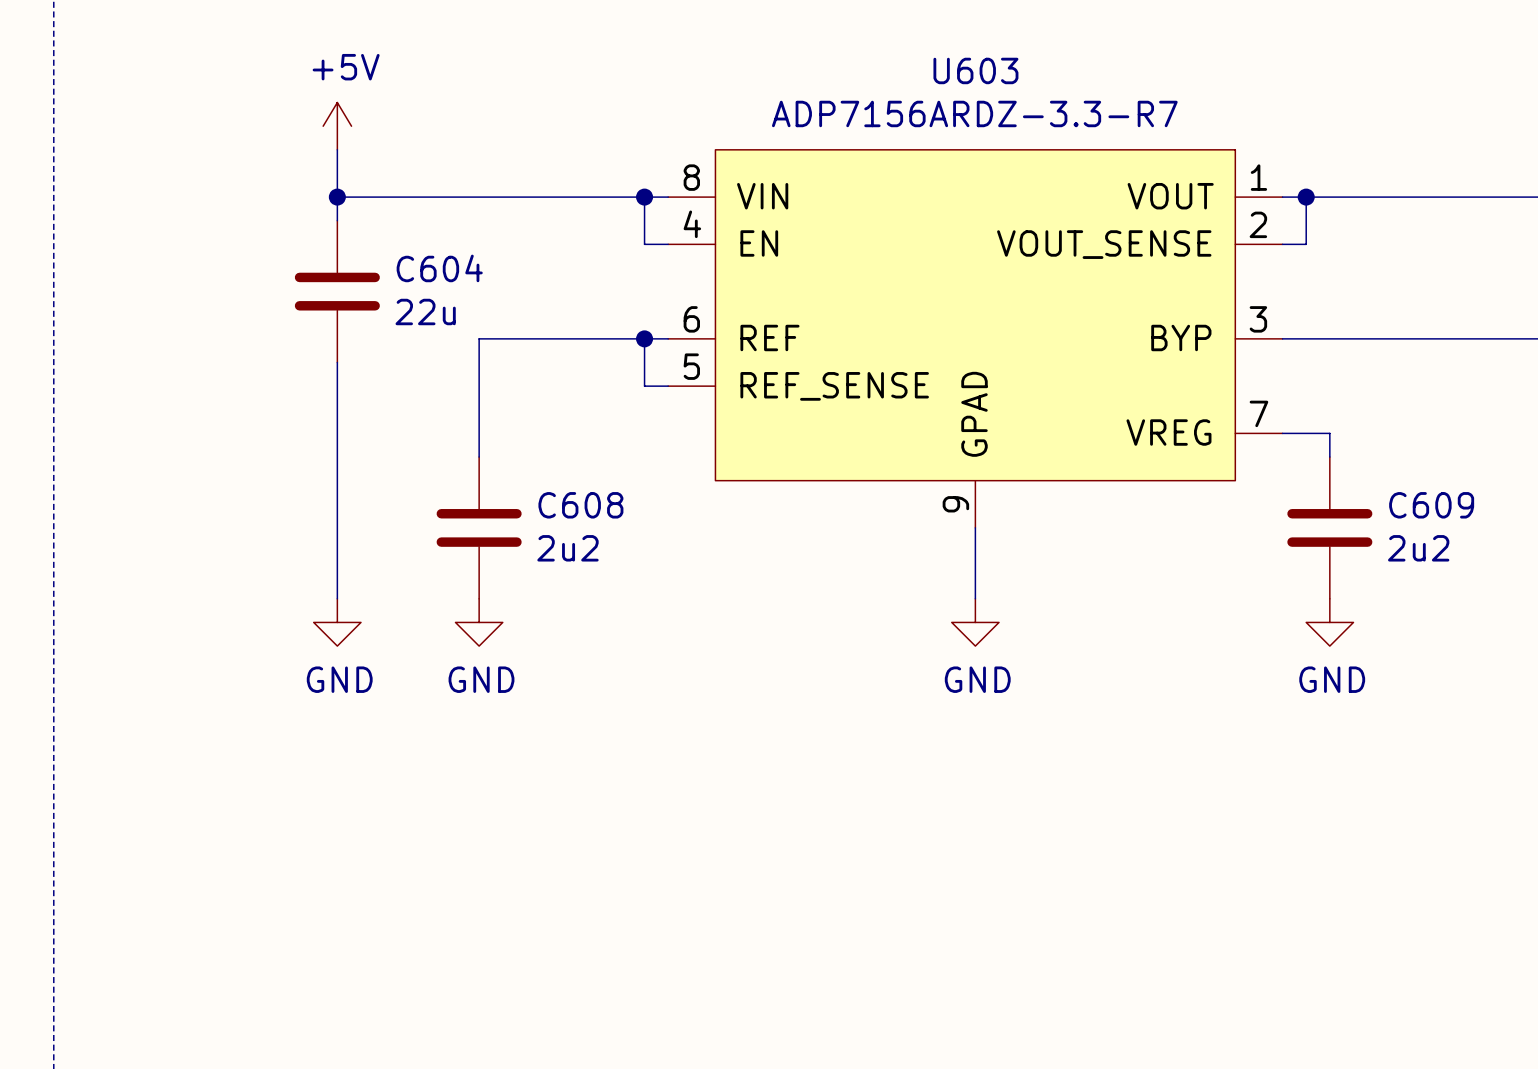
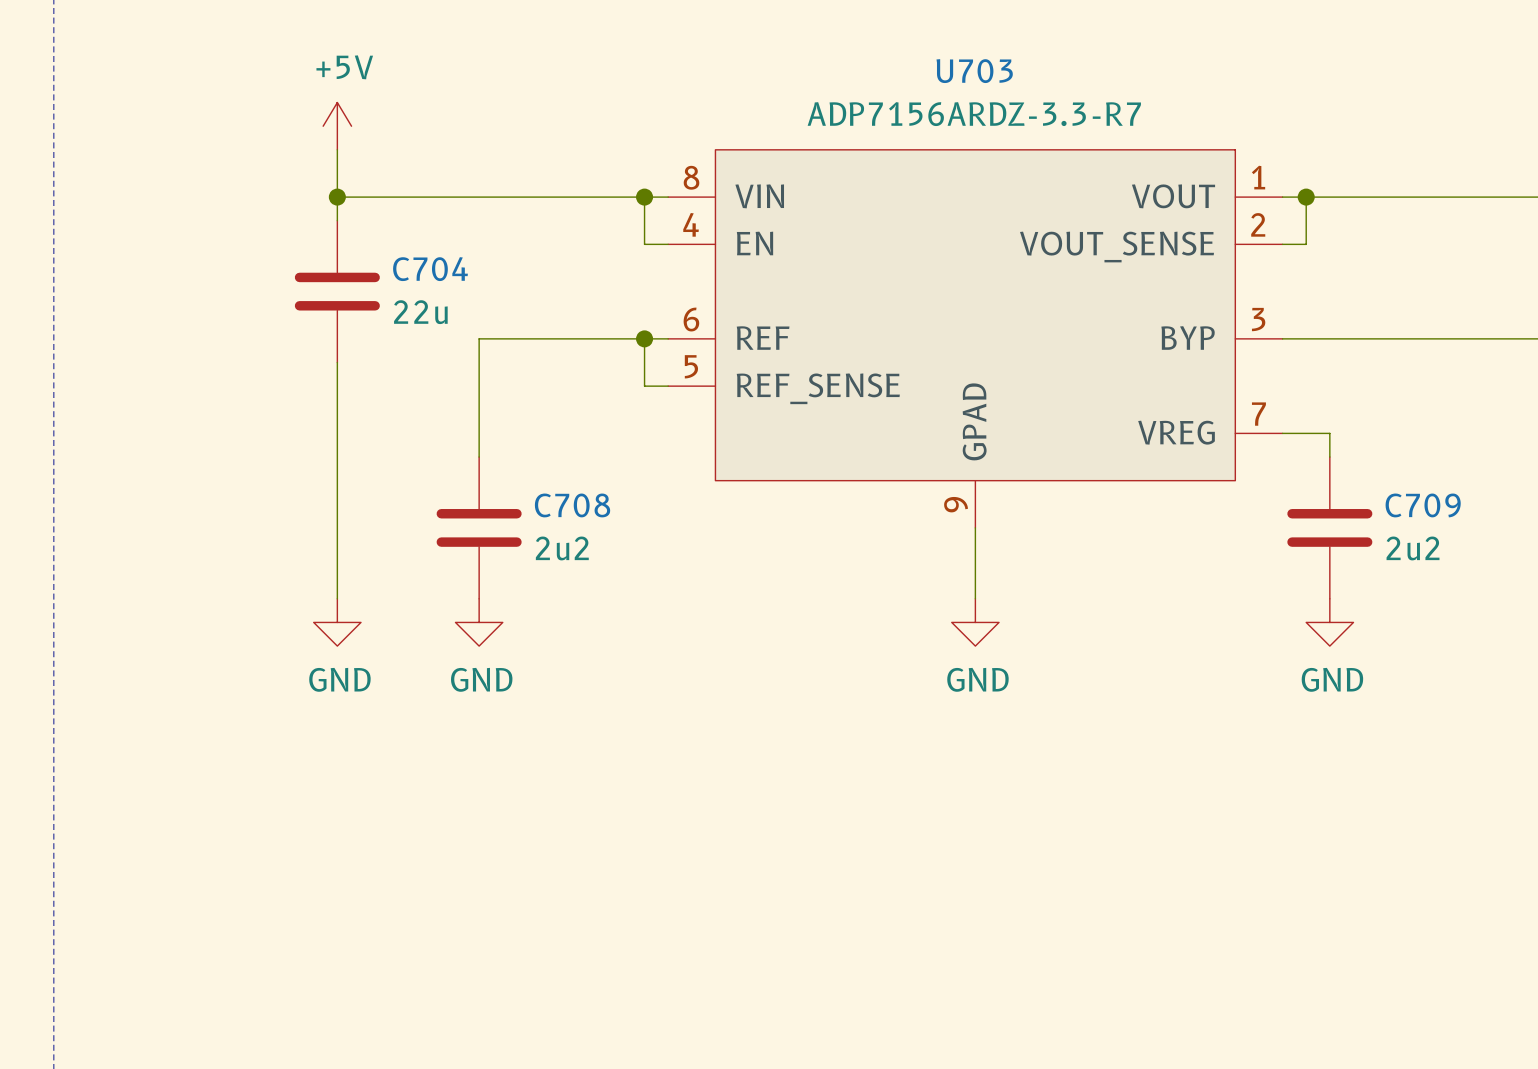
U603 name: U603 (975, 70) -> U703 (974, 71)
C604 name: C604 (439, 268) -> C704 (430, 269)
C608 name: C608 (580, 505) -> C708 (572, 505)
C609 name: C609 (1431, 505) -> C709 (1423, 505)

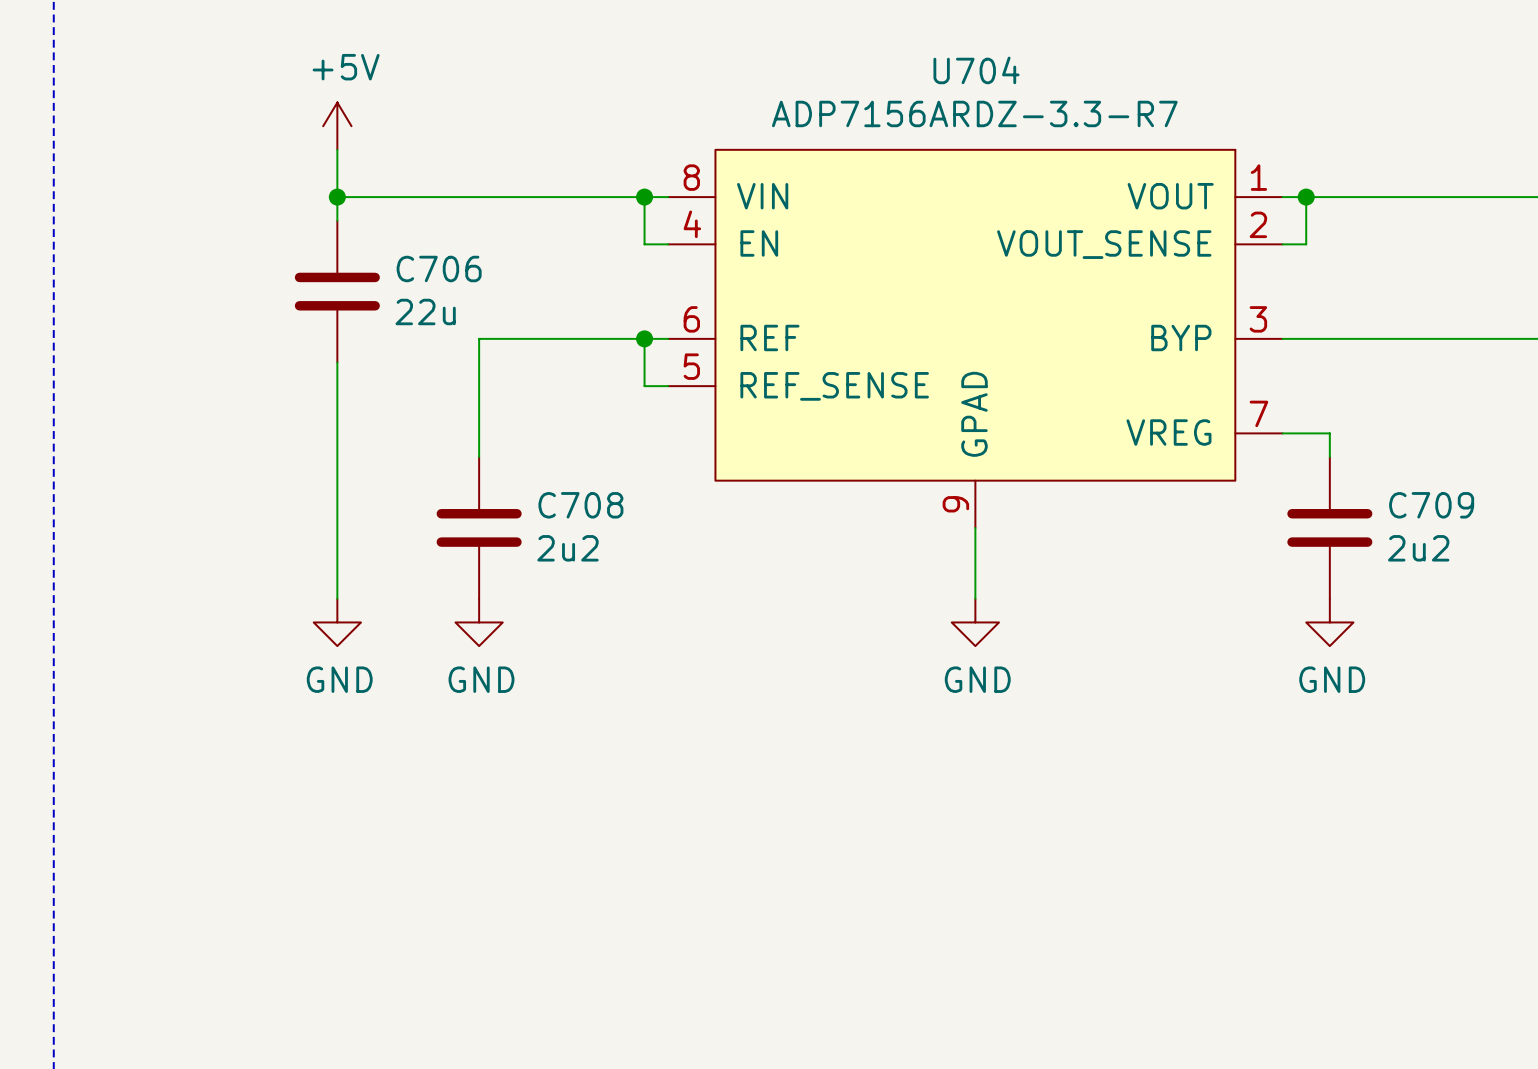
U703 name: U703 (974, 71) -> U704 (976, 70)
C704 name: C704 (430, 269) -> C706 (439, 268)

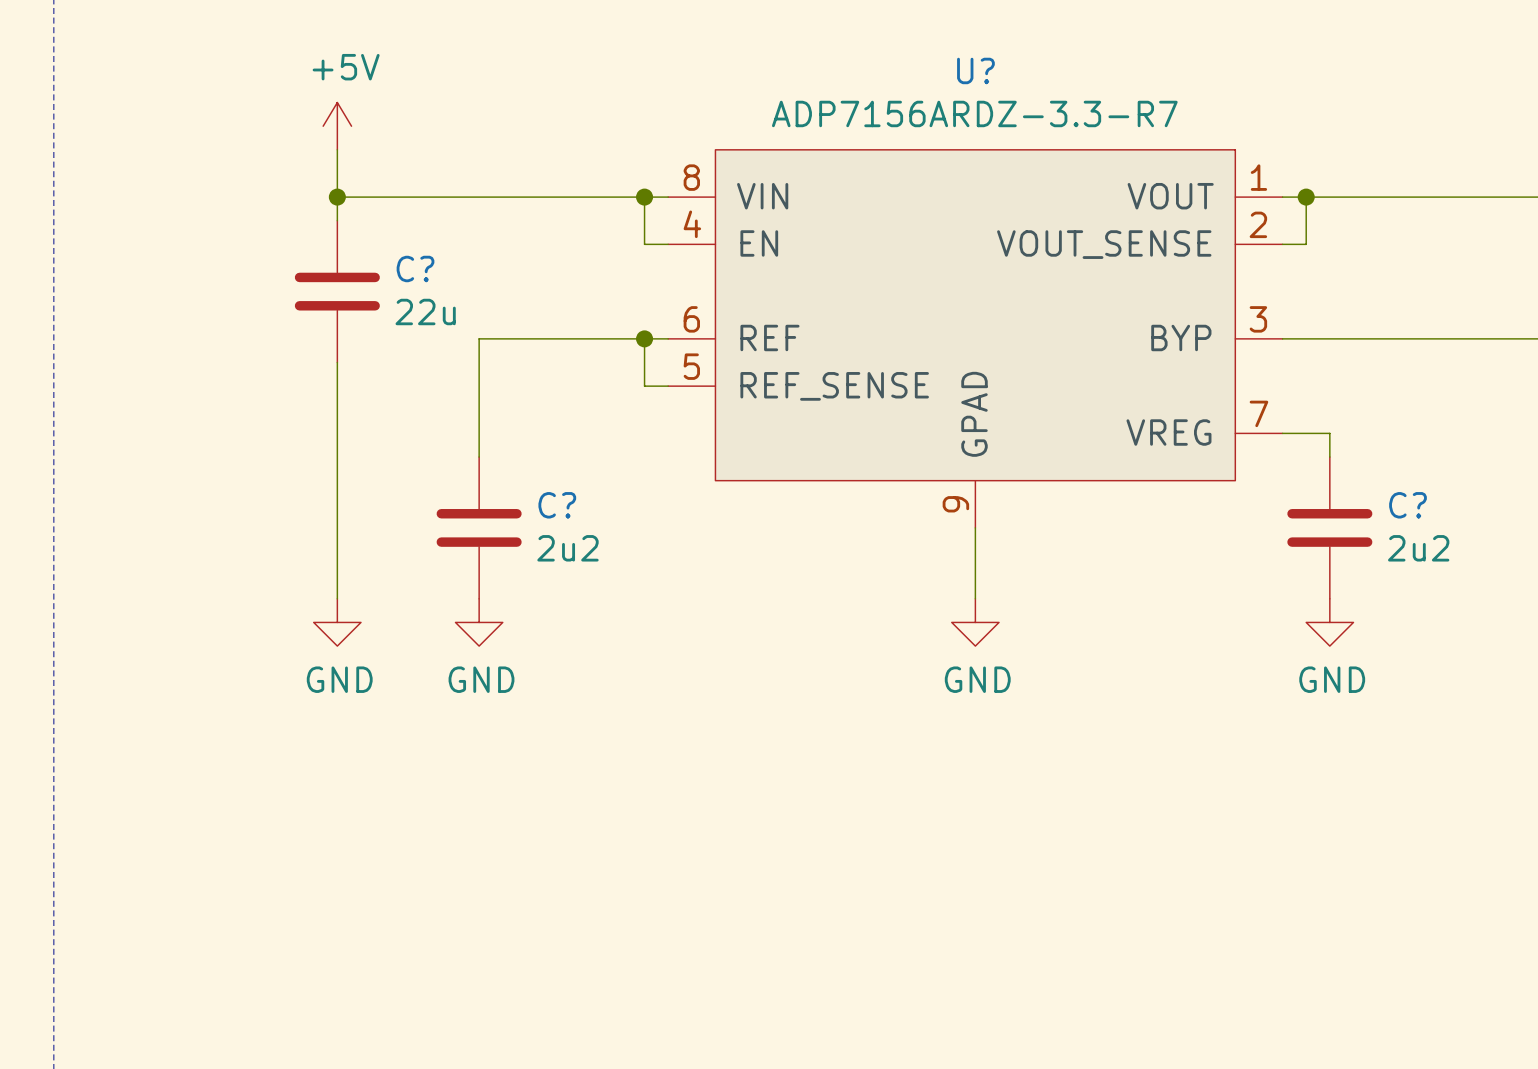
U704 name: U704 (976, 70) -> U? (975, 70)
C706 name: C706 (439, 268) -> C? (415, 268)
C708 name: C708 (580, 505) -> C? (557, 505)
C709 name: C709 (1431, 505) -> C? (1408, 505)

